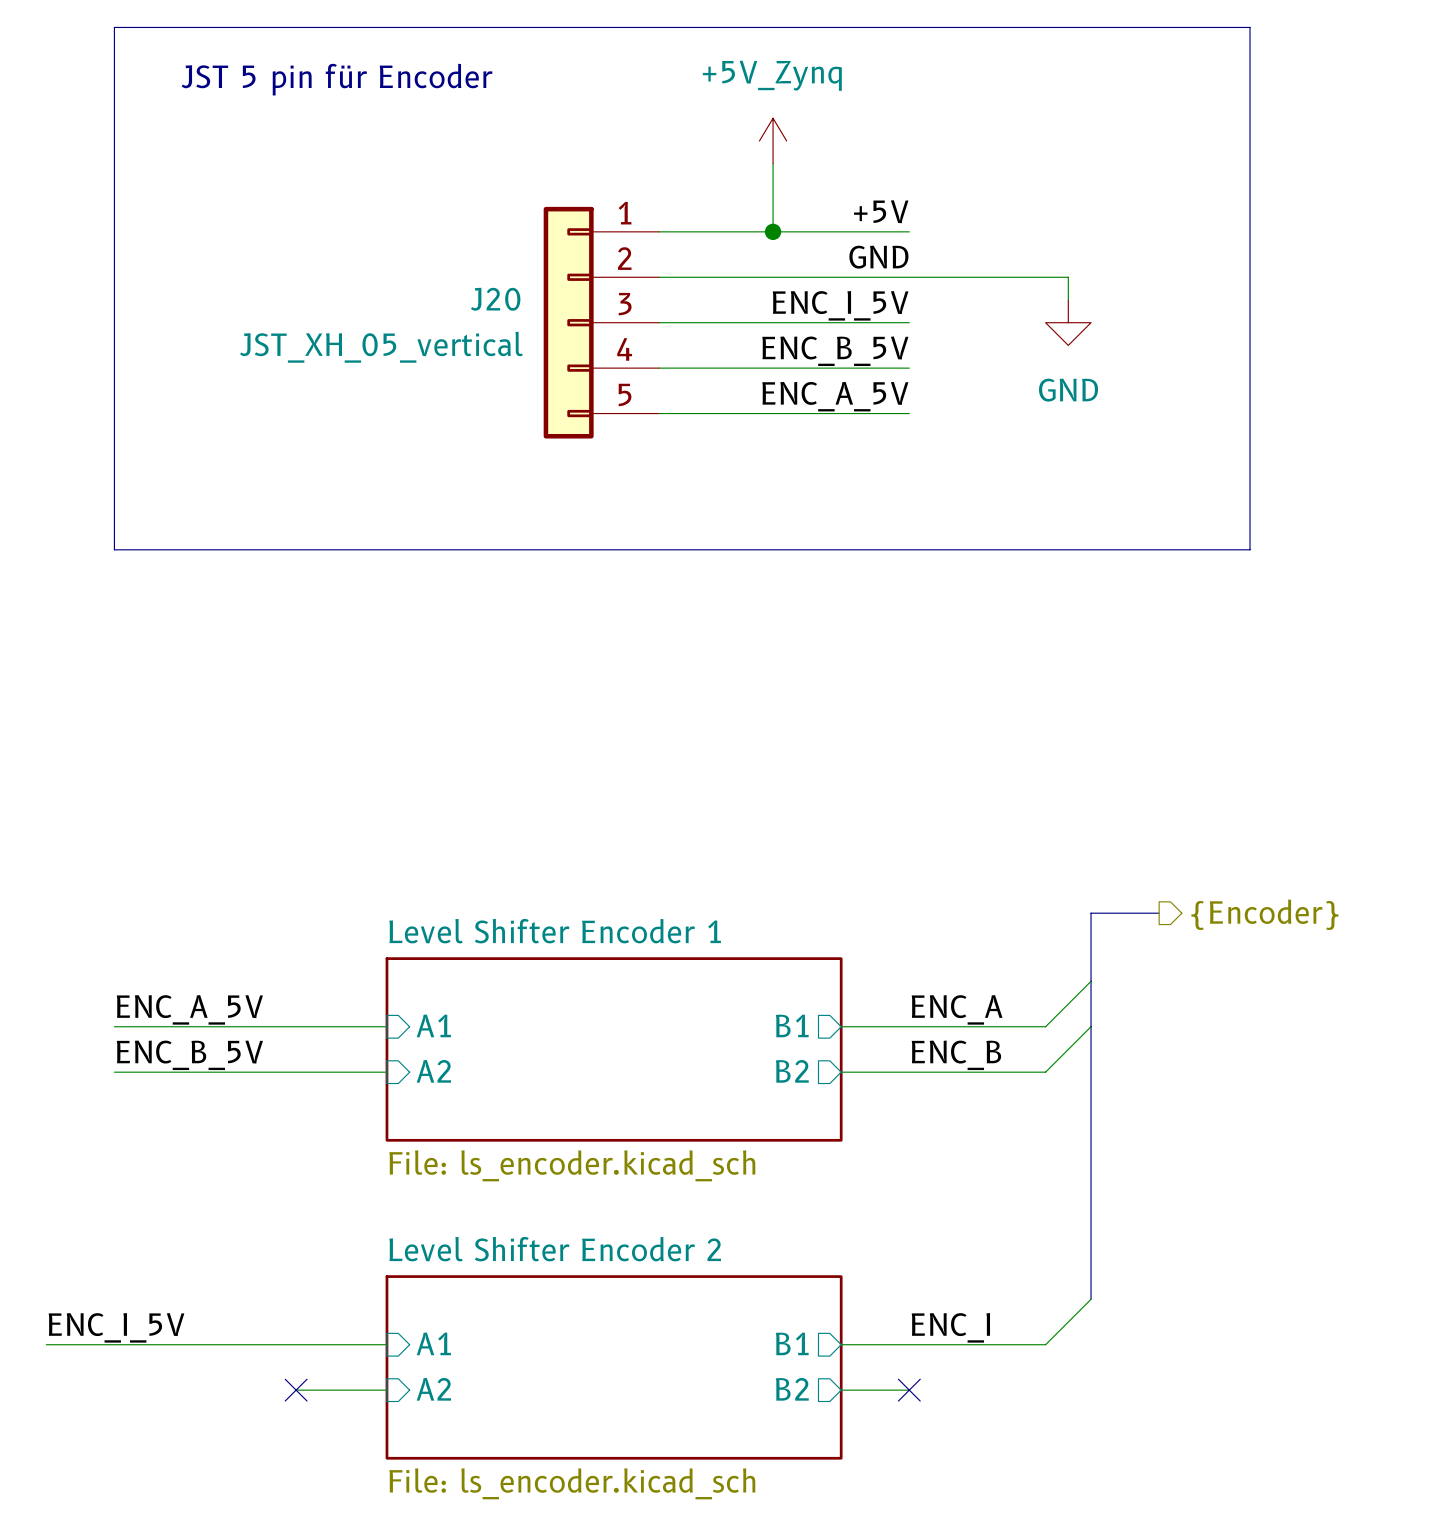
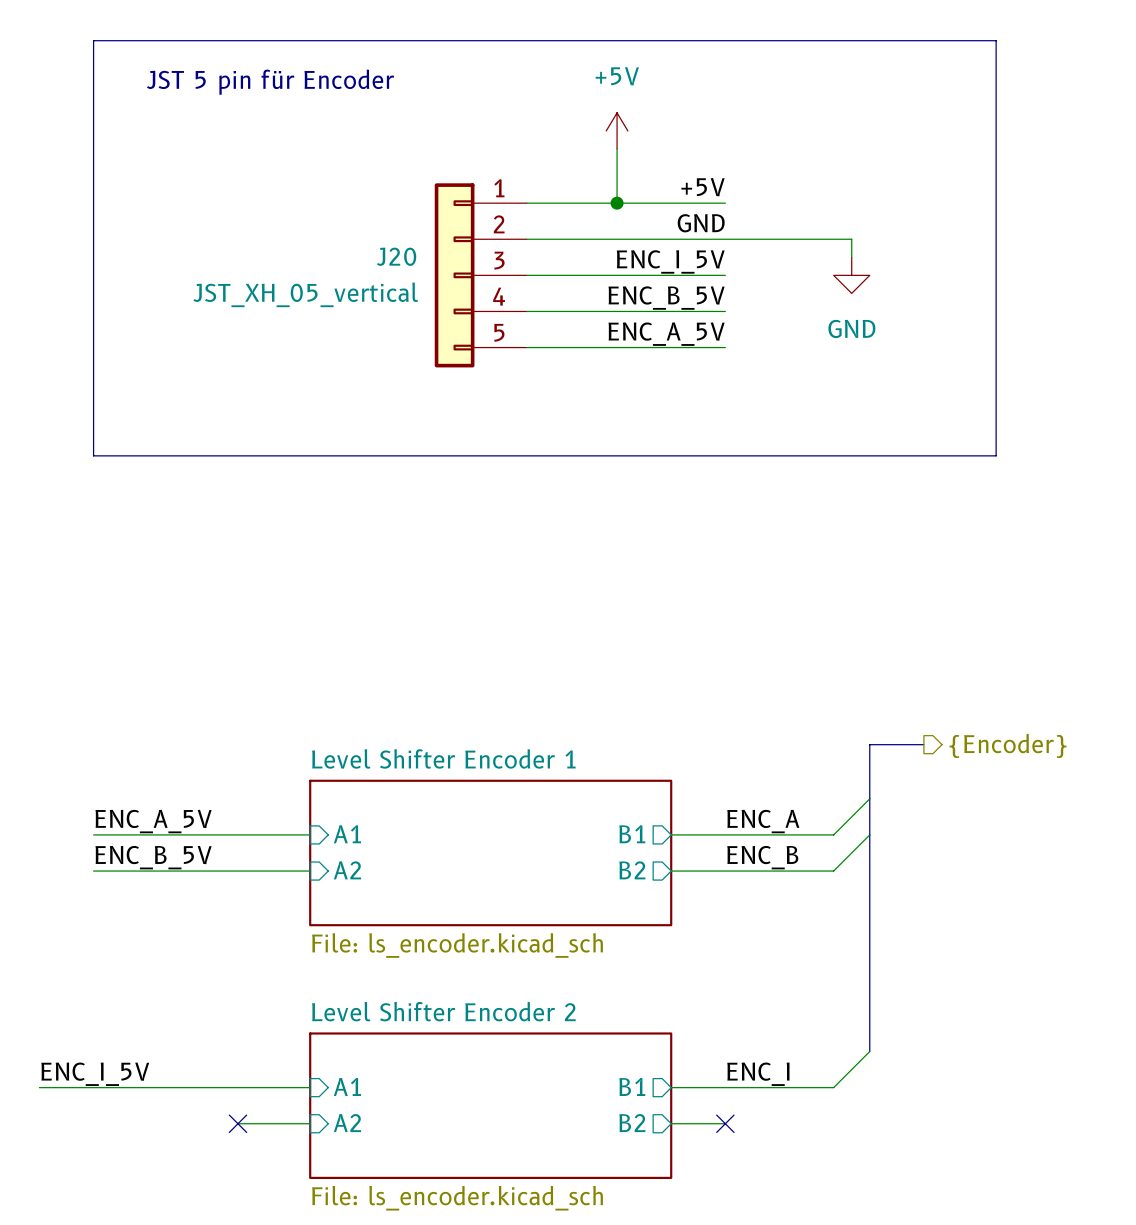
power symbol: +5V_Zynq (773, 141) -> +5V (617, 130)

